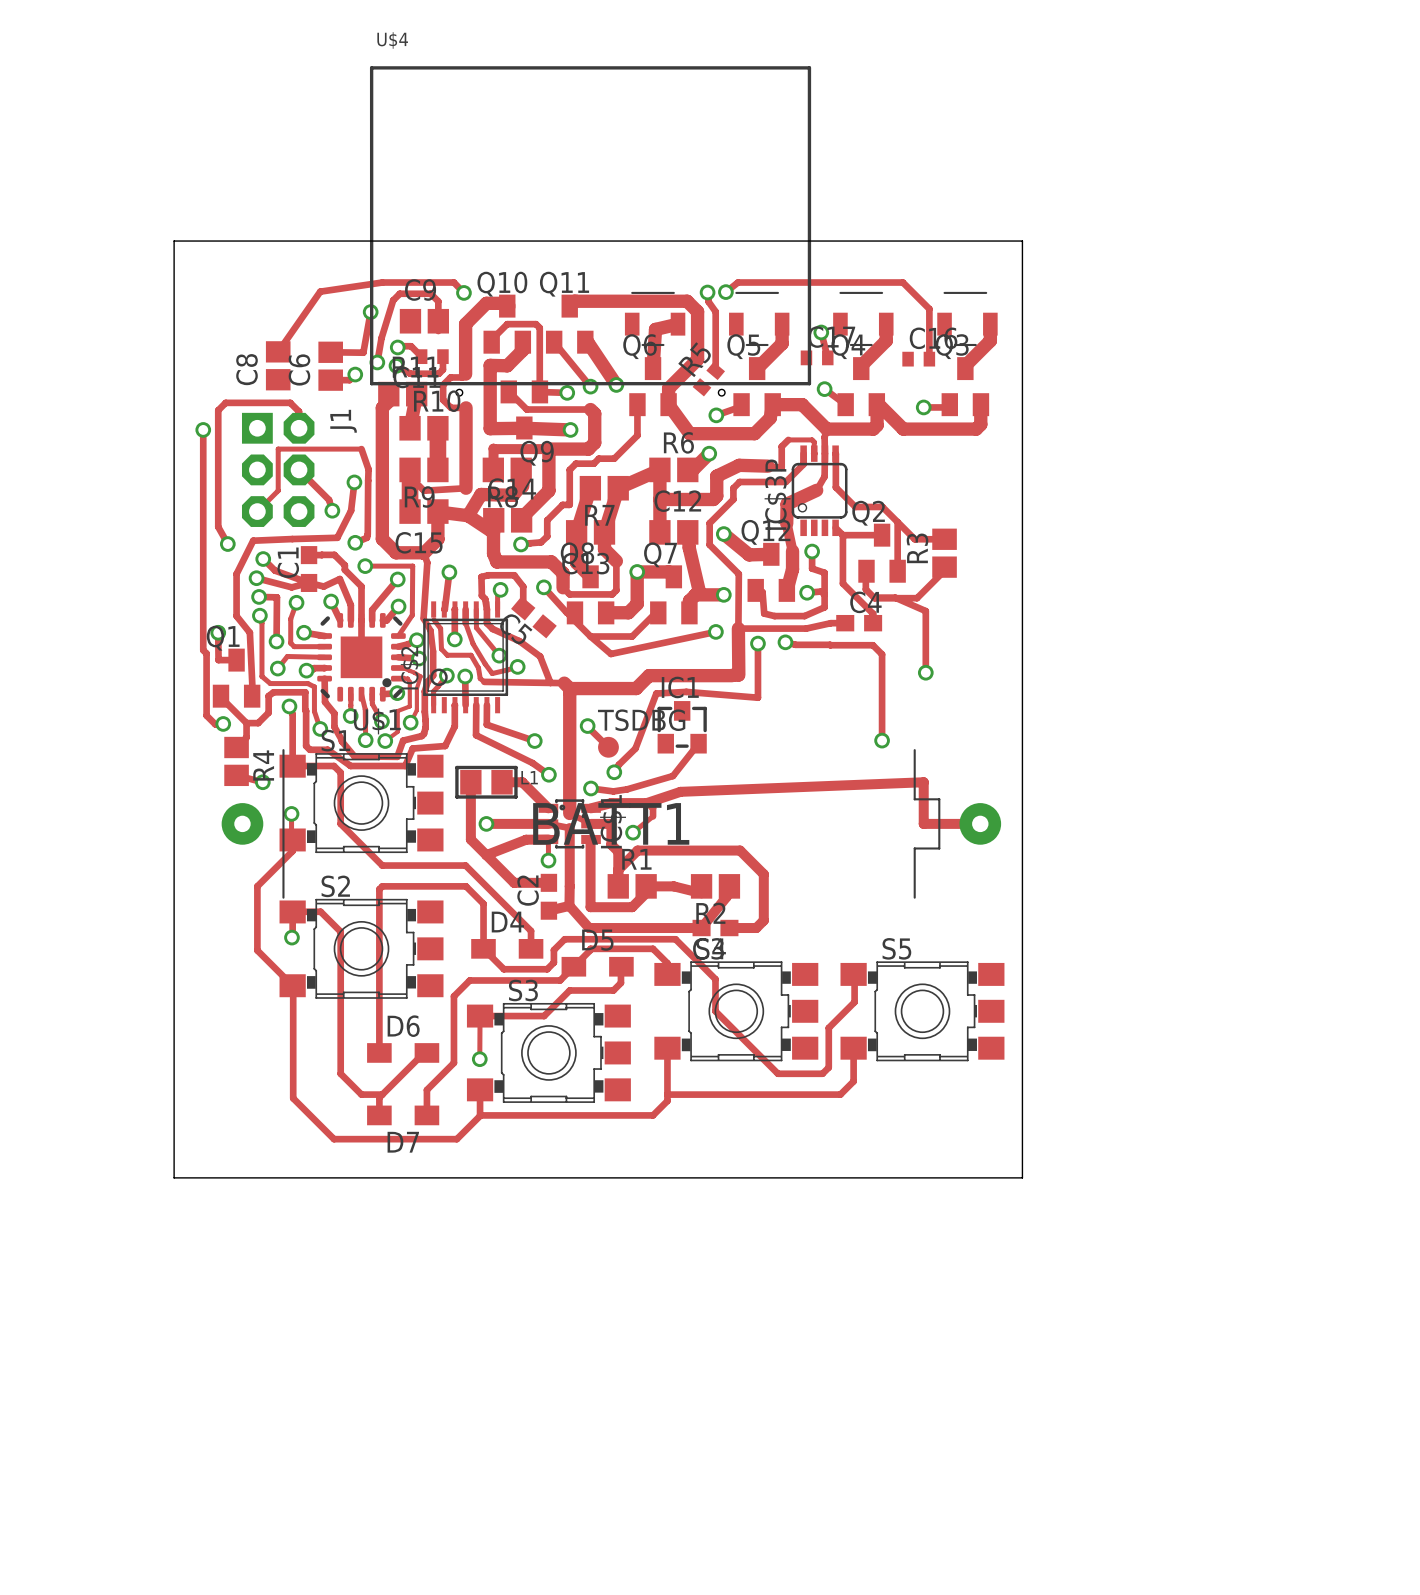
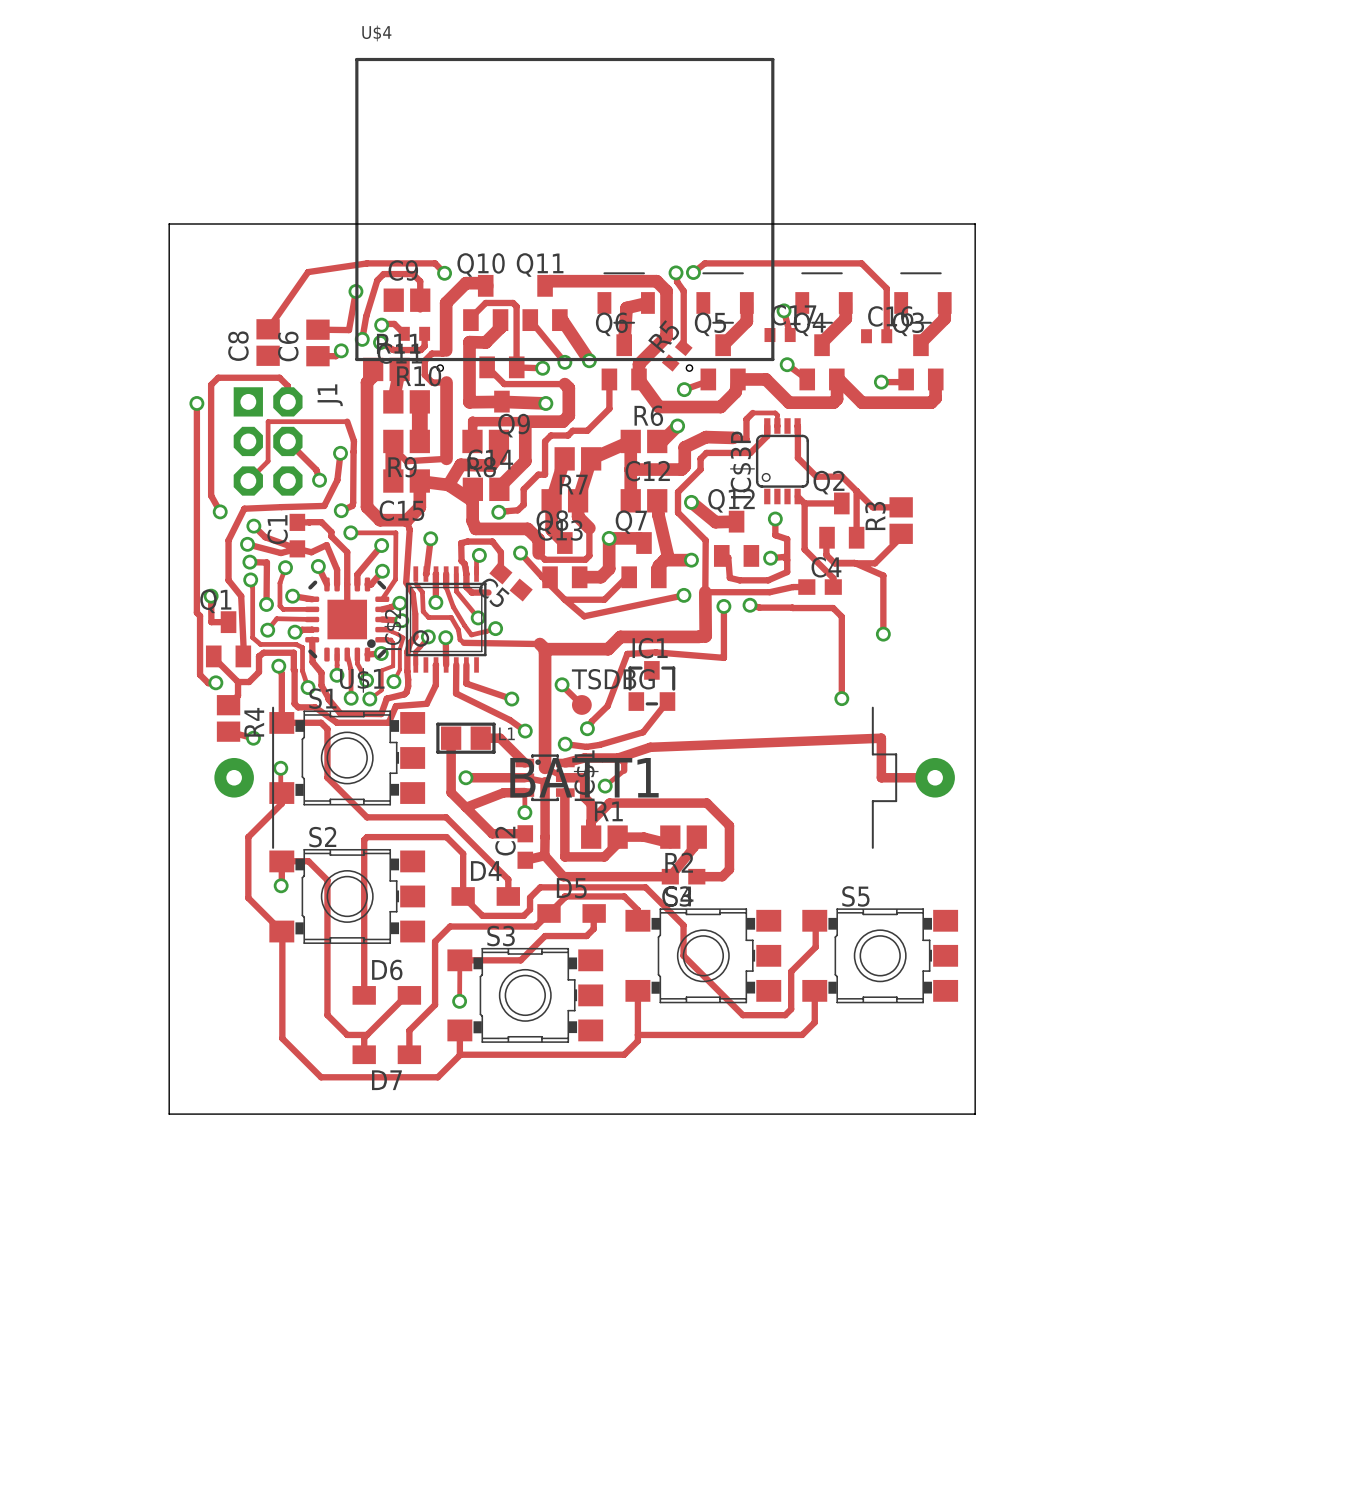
track: (826, 429) (824, 437) (824, 476) (816, 490) (787, 504) (786, 523) (792, 551) (792, 569) (786, 590) -> none
track: (492, 629) (519, 641) (540, 656) (550, 682) -> (471, 592) (488, 592)

